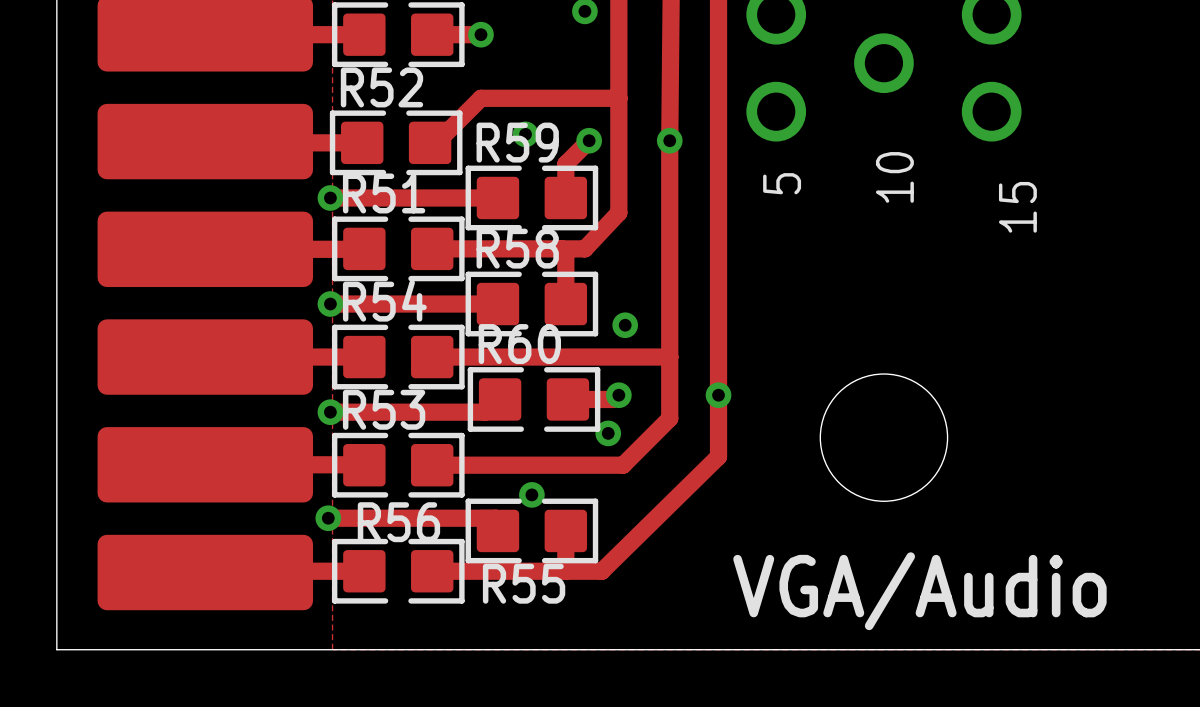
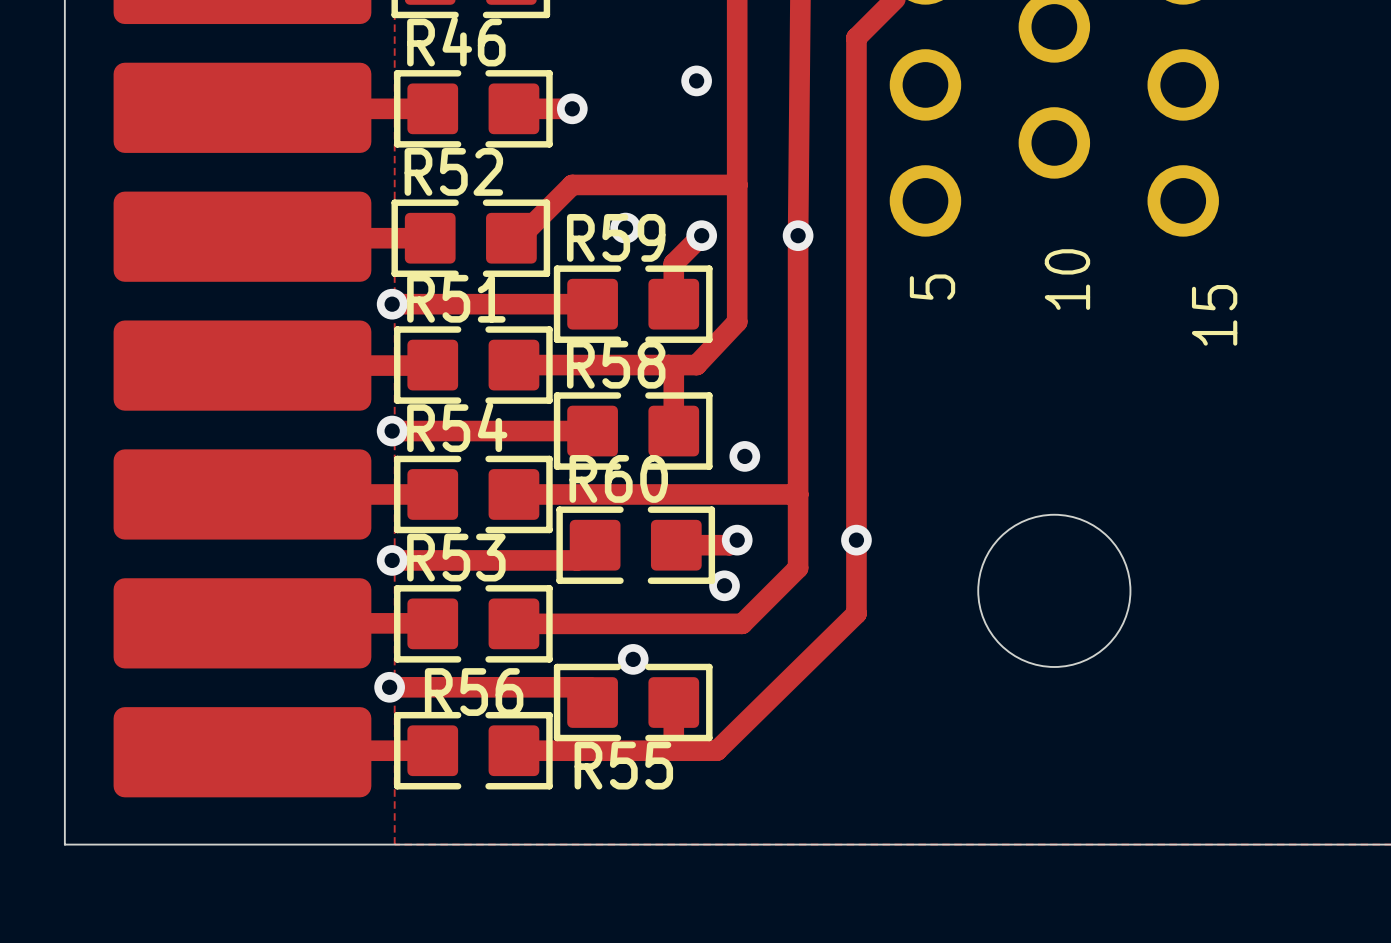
text: VGA/Audio (919, 591) -> none

